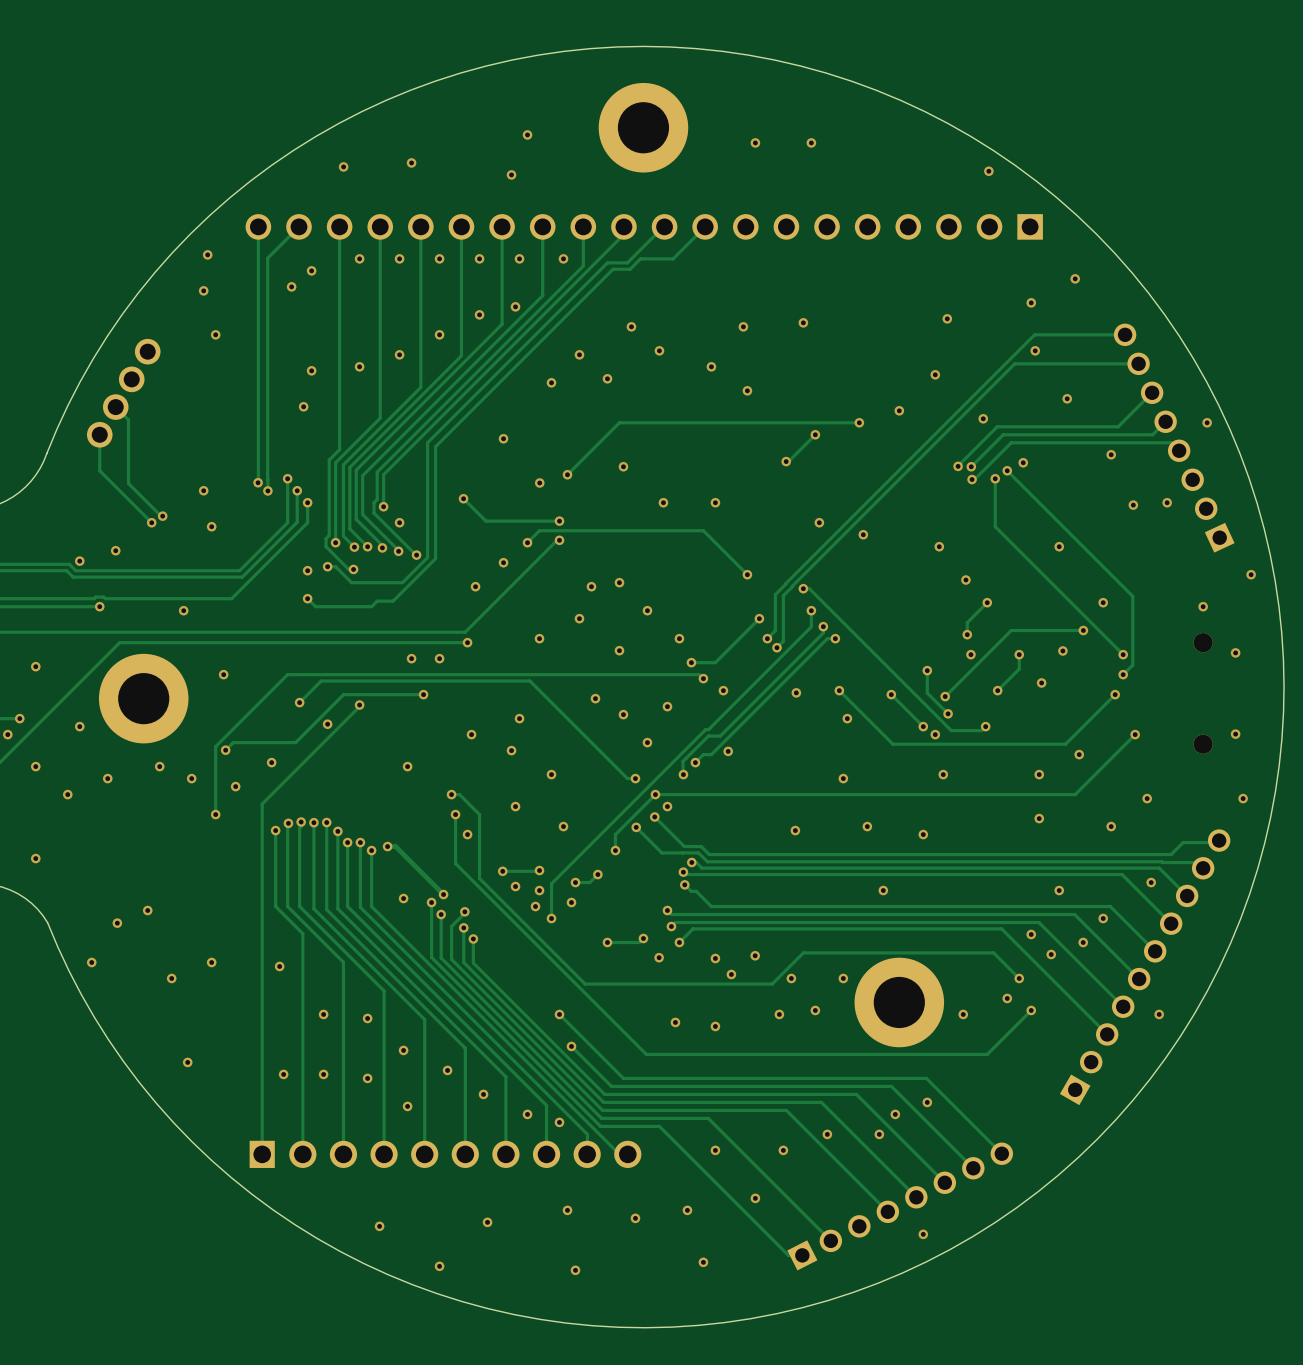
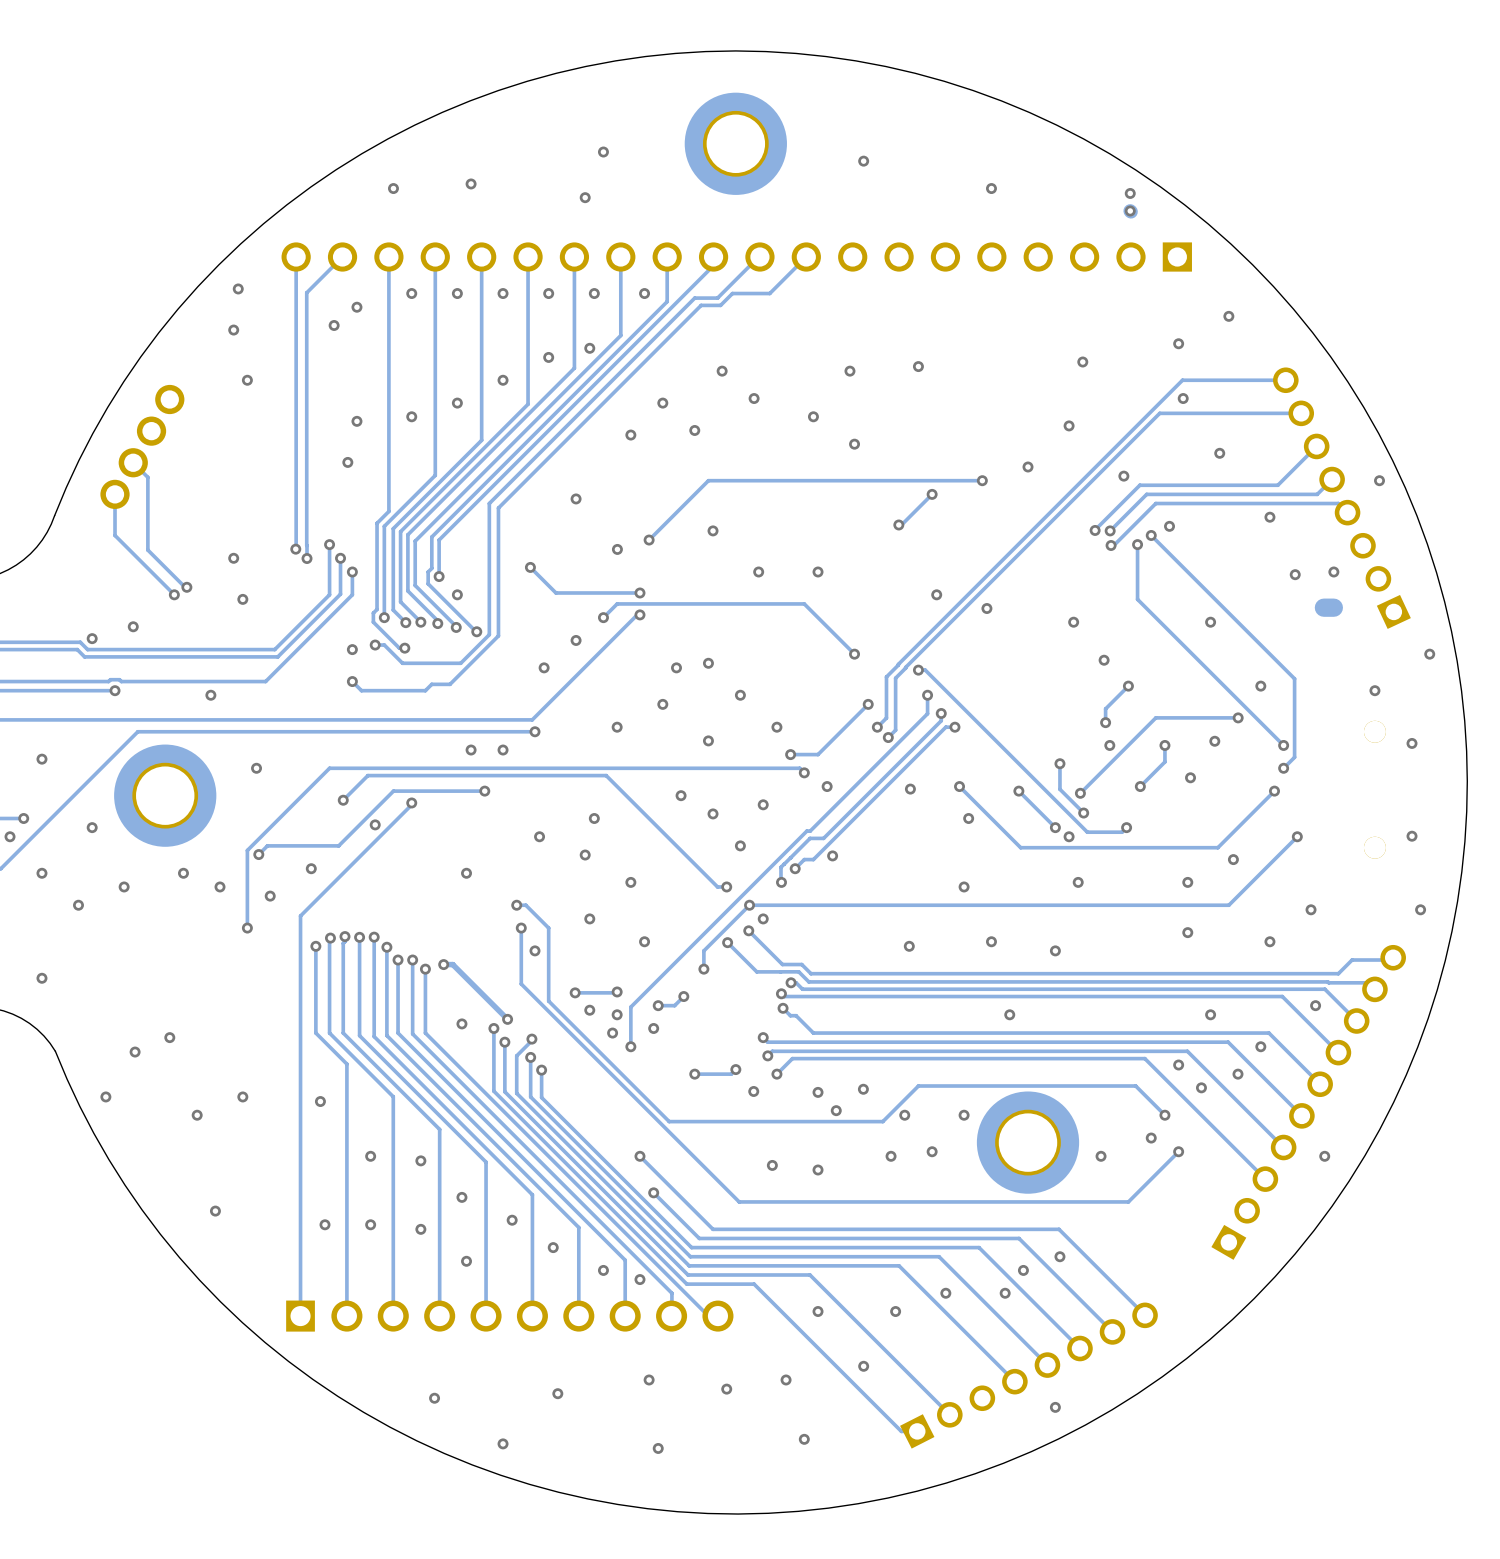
via position: (811, 142) -> (991, 188)
track: none -> (1130, 210) (1130, 211)
via: none -> (1130, 210)
track: none -> (1333, 607) (1323, 607)

